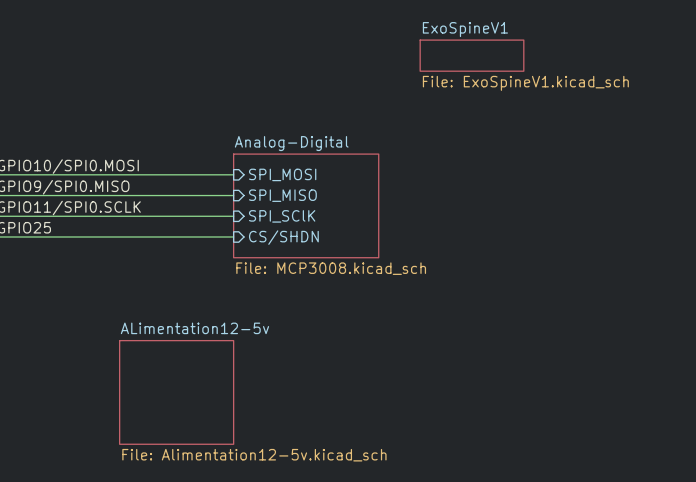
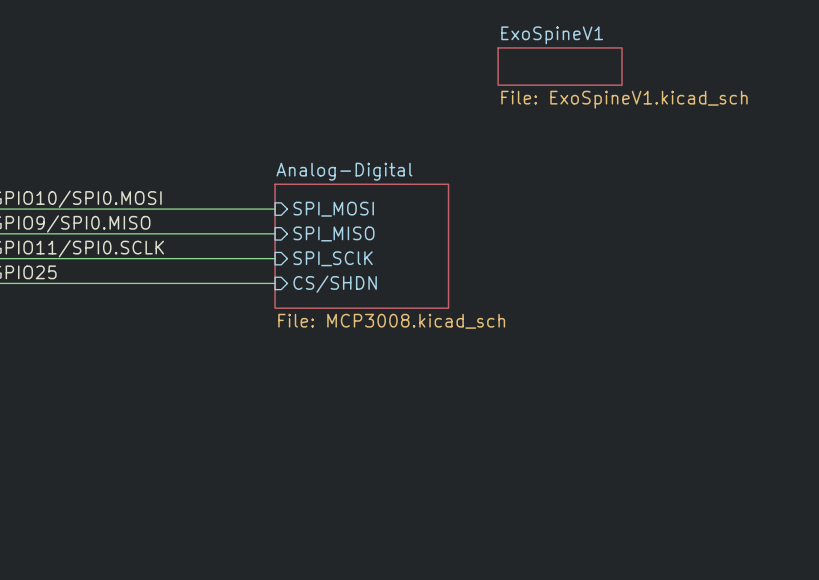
sheet ALimentation12-5v: File: Alimentation12-5v.kicad_sch (176, 392) -> none

